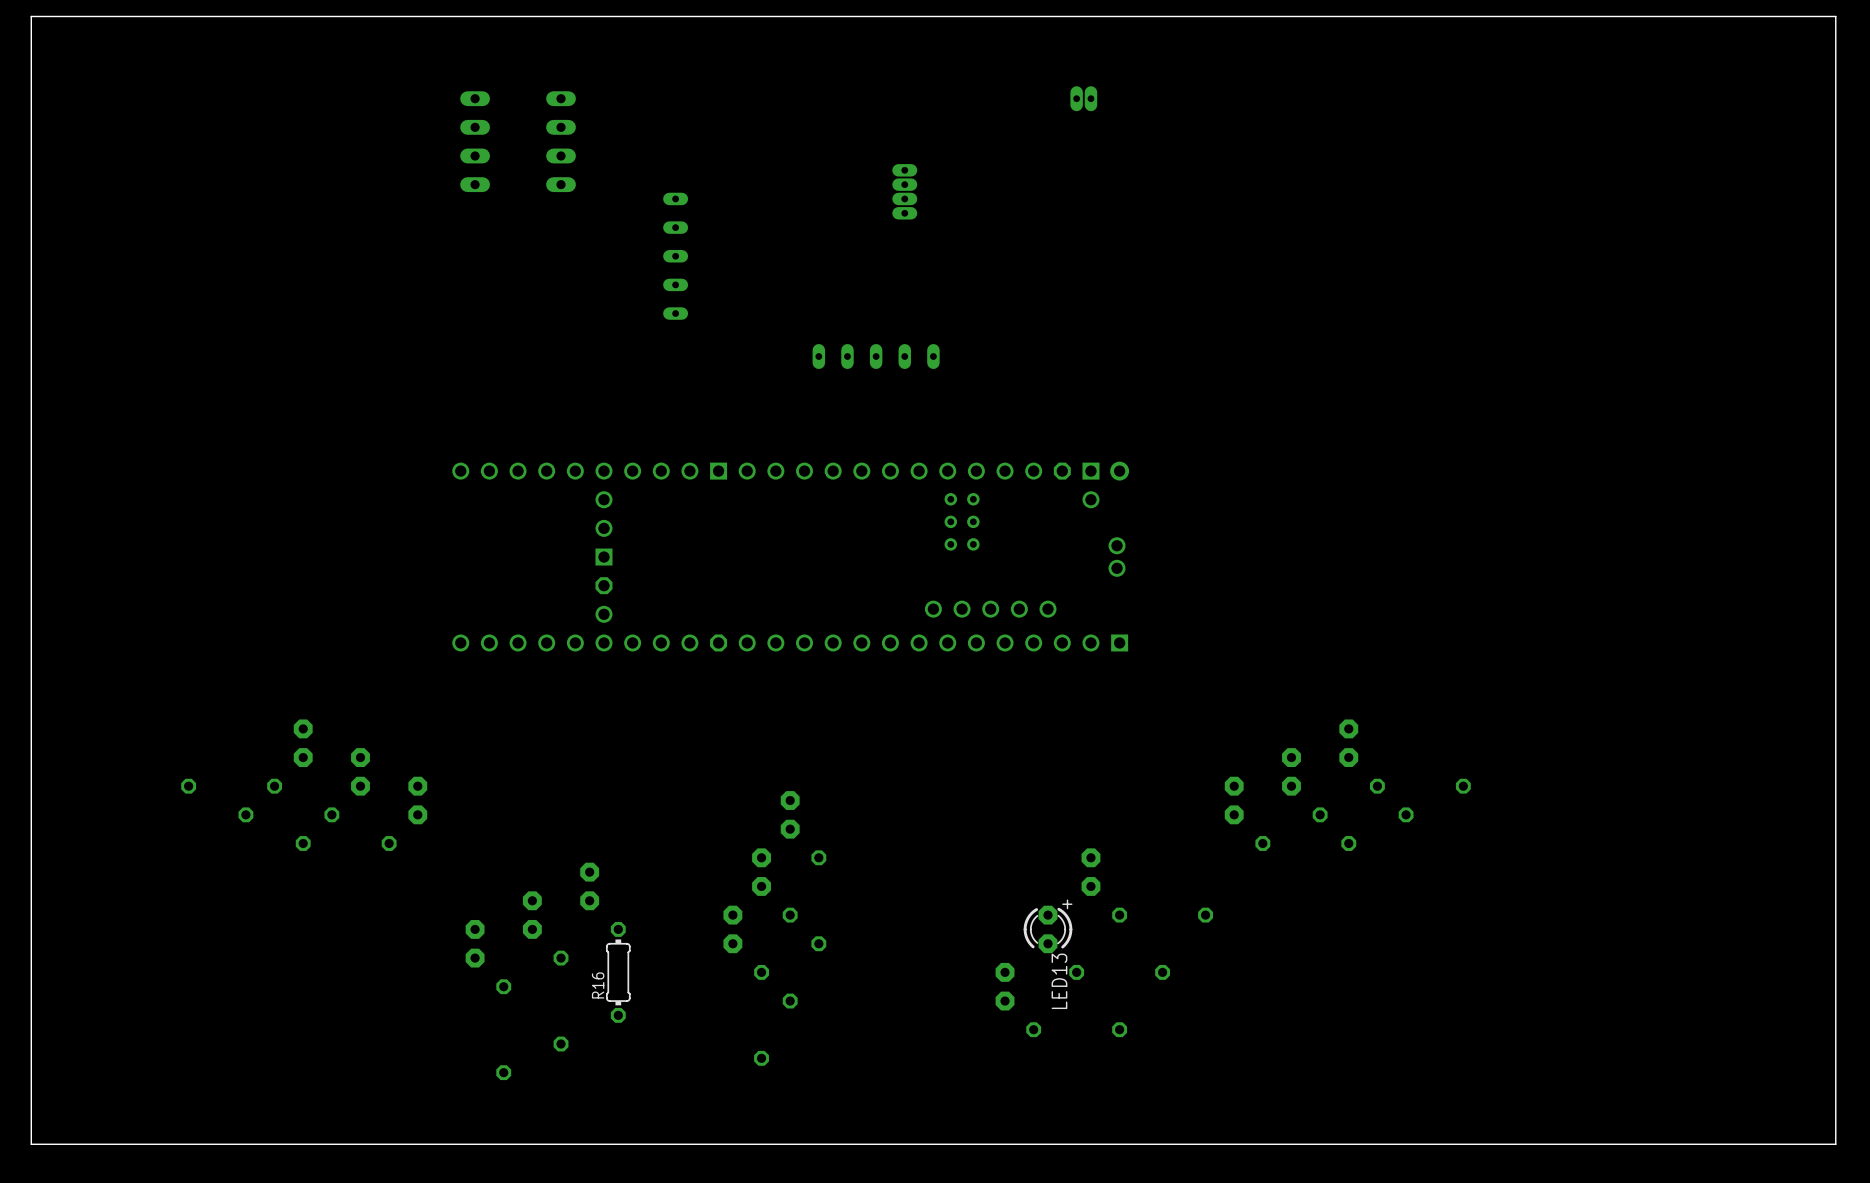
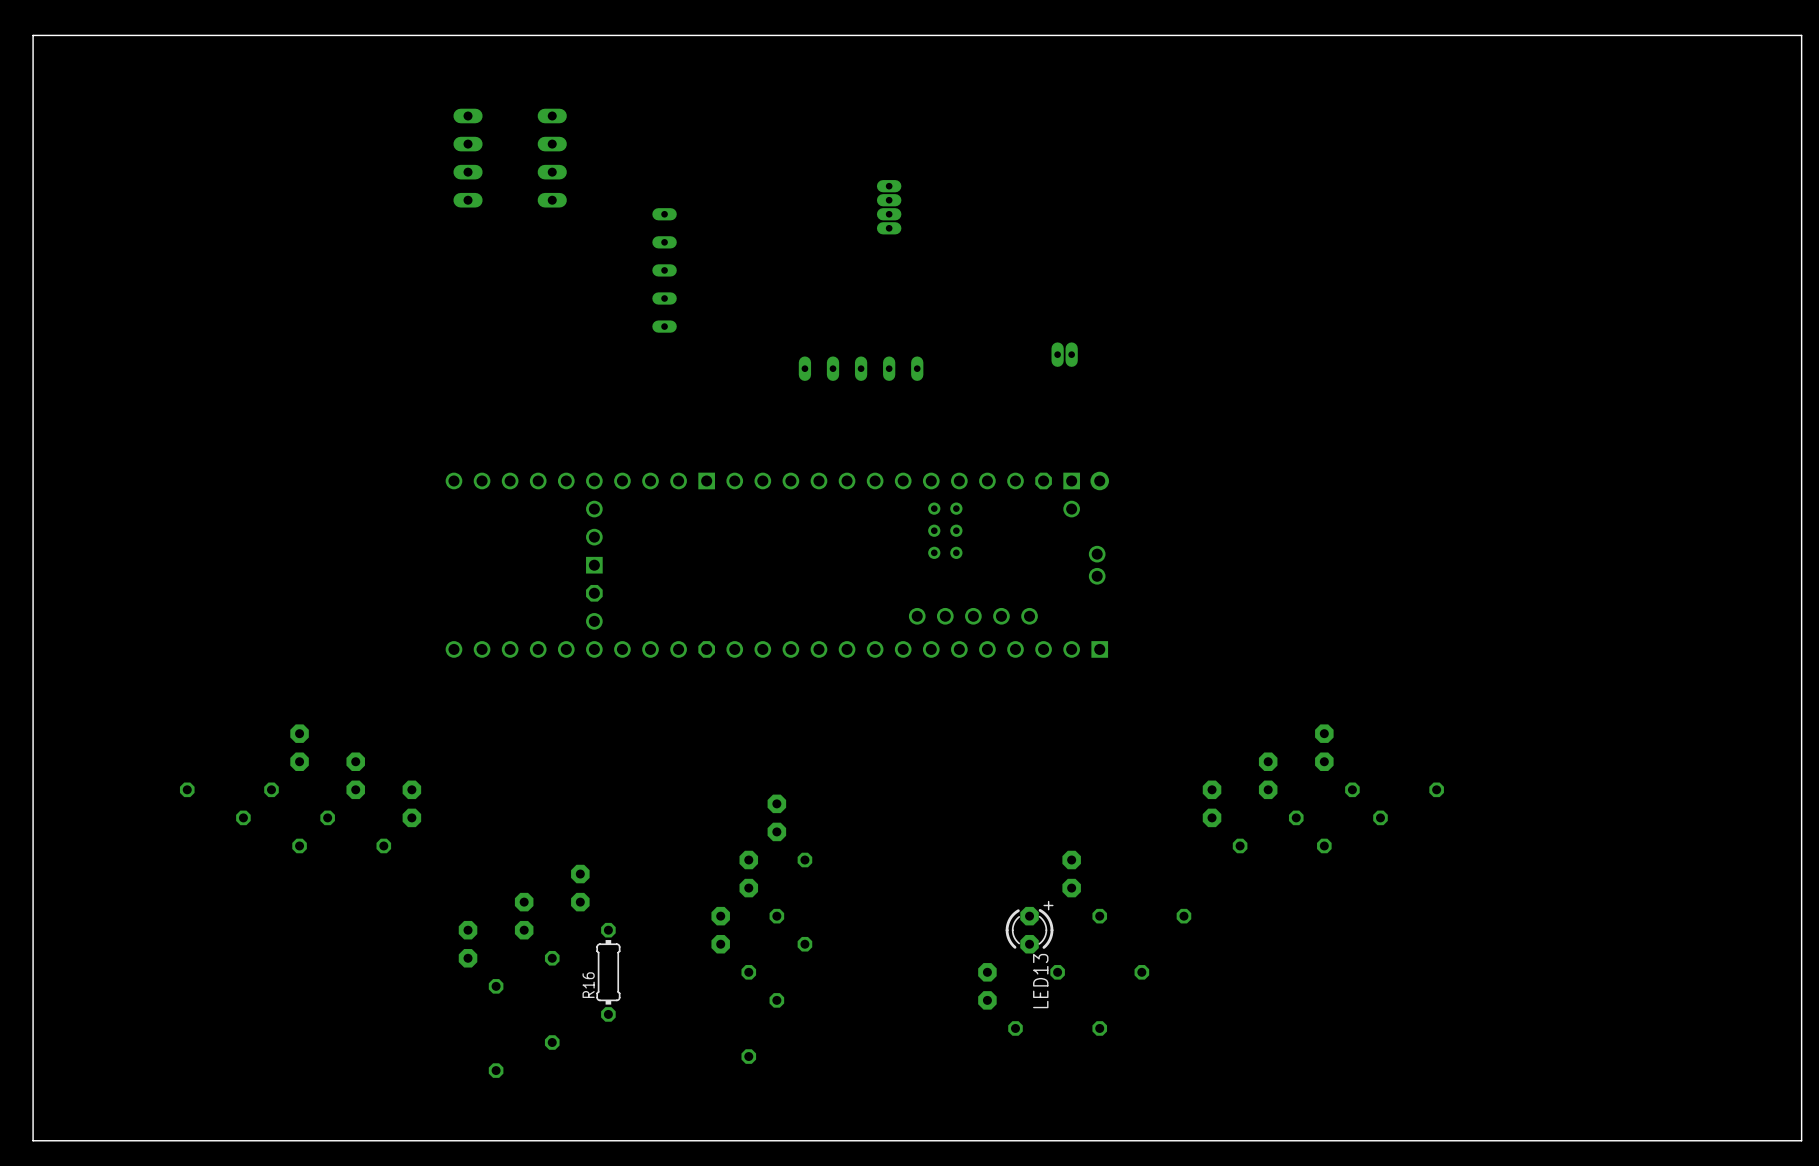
part position: (1083, 98) -> (1064, 354)

